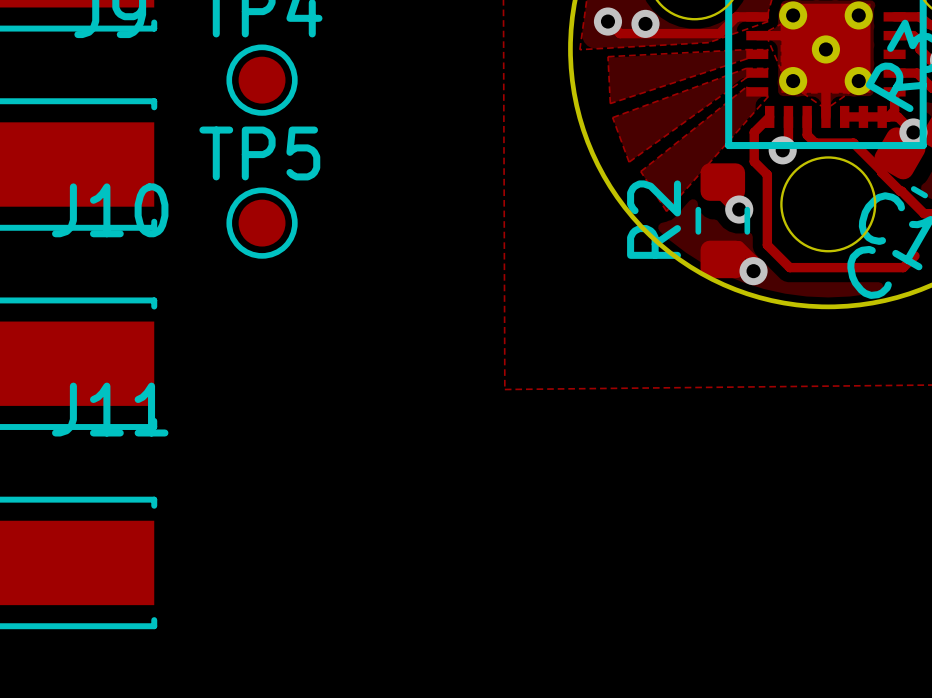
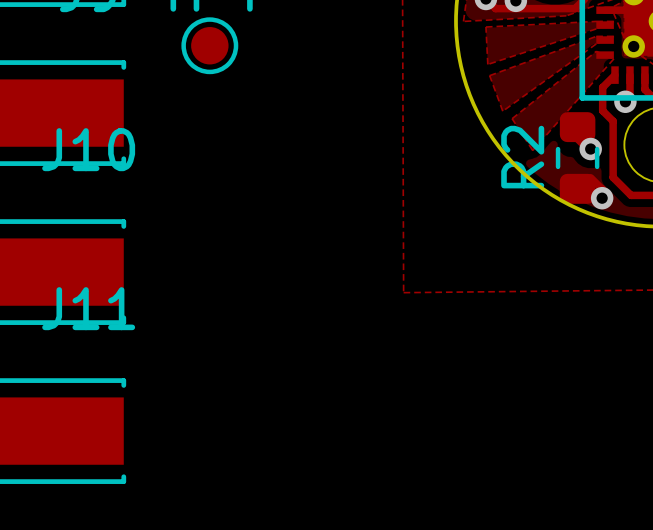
TP5: (262, 223) -> none

